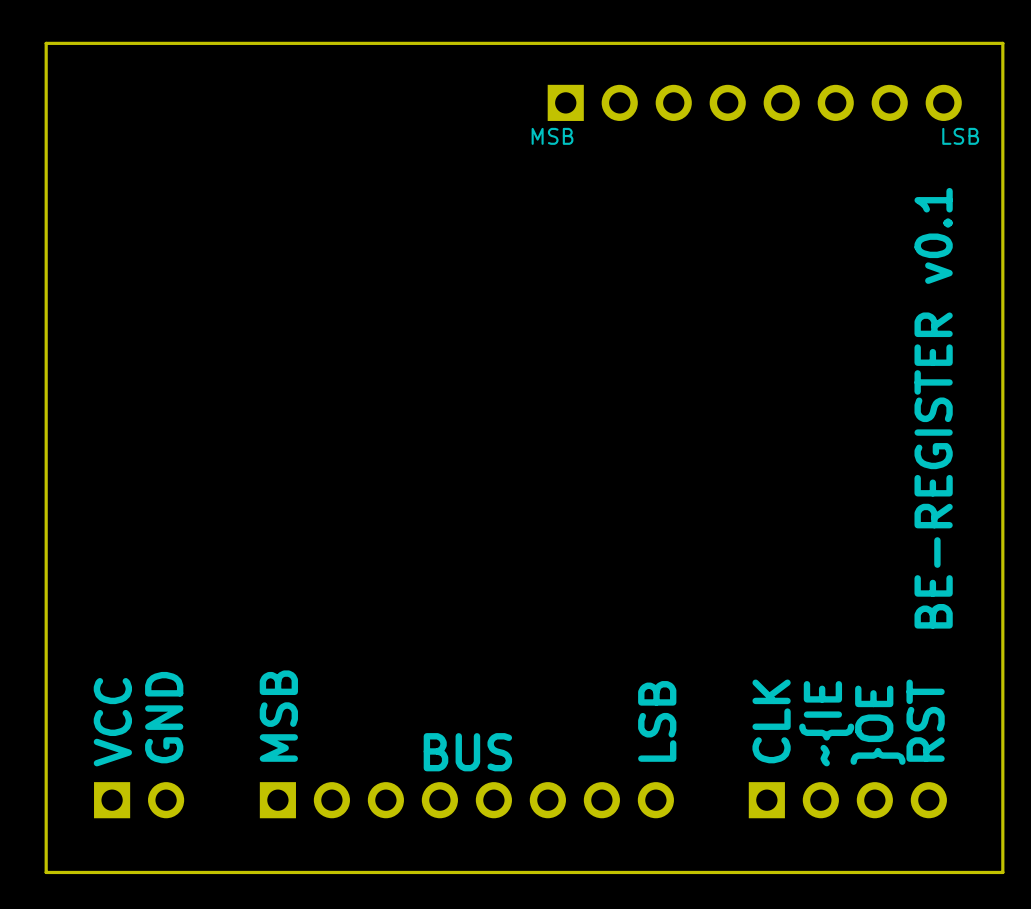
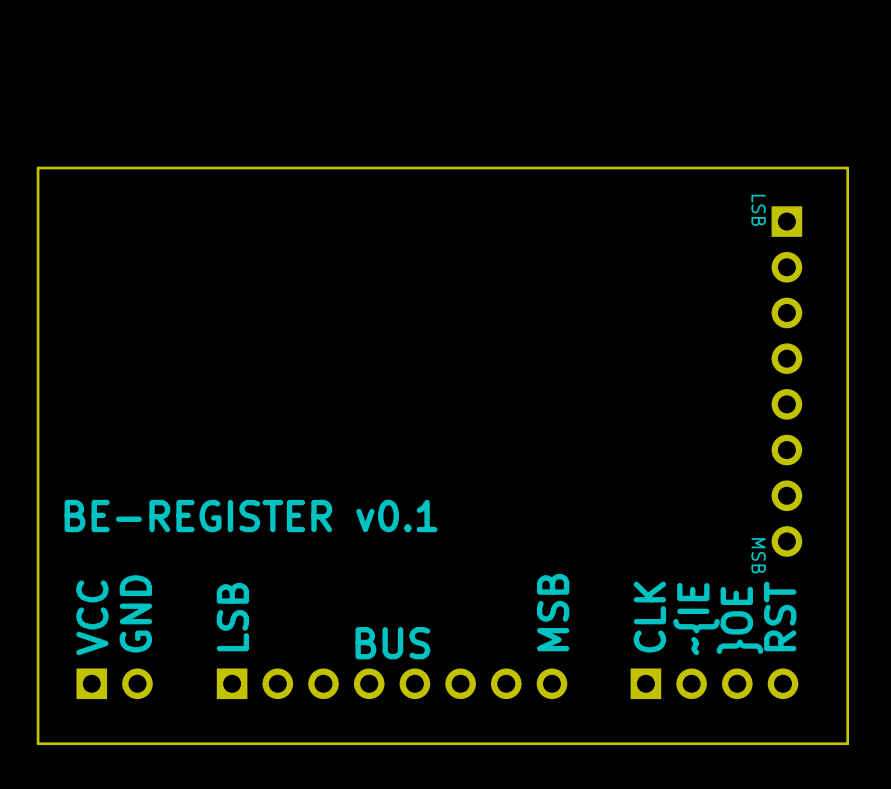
board edge: (1002, 43) (46, 43) (46, 872) (1002, 872) (1002, 43) -> (847, 168) (847, 743) (38, 743) (38, 168) (847, 168)
part rotation: 0° (754, 102) -> 90° clockwise (786, 381)
part position: (754, 102) -> (786, 381)
text: MSB (552, 136) -> none
text rotation: 0° (960, 136) -> 90° clockwise (758, 210)
text position: LSB (960, 136) -> LSB (758, 210)
text: BE-REGISTER v0.1 (933, 408) -> none
text: none -> BE-REGISTER v0.1 (251, 516)
text: none -> MSB (758, 555)
text: MSB (278, 716) -> LSB (232, 617)
text: LSB (657, 721) -> MSB (553, 612)

